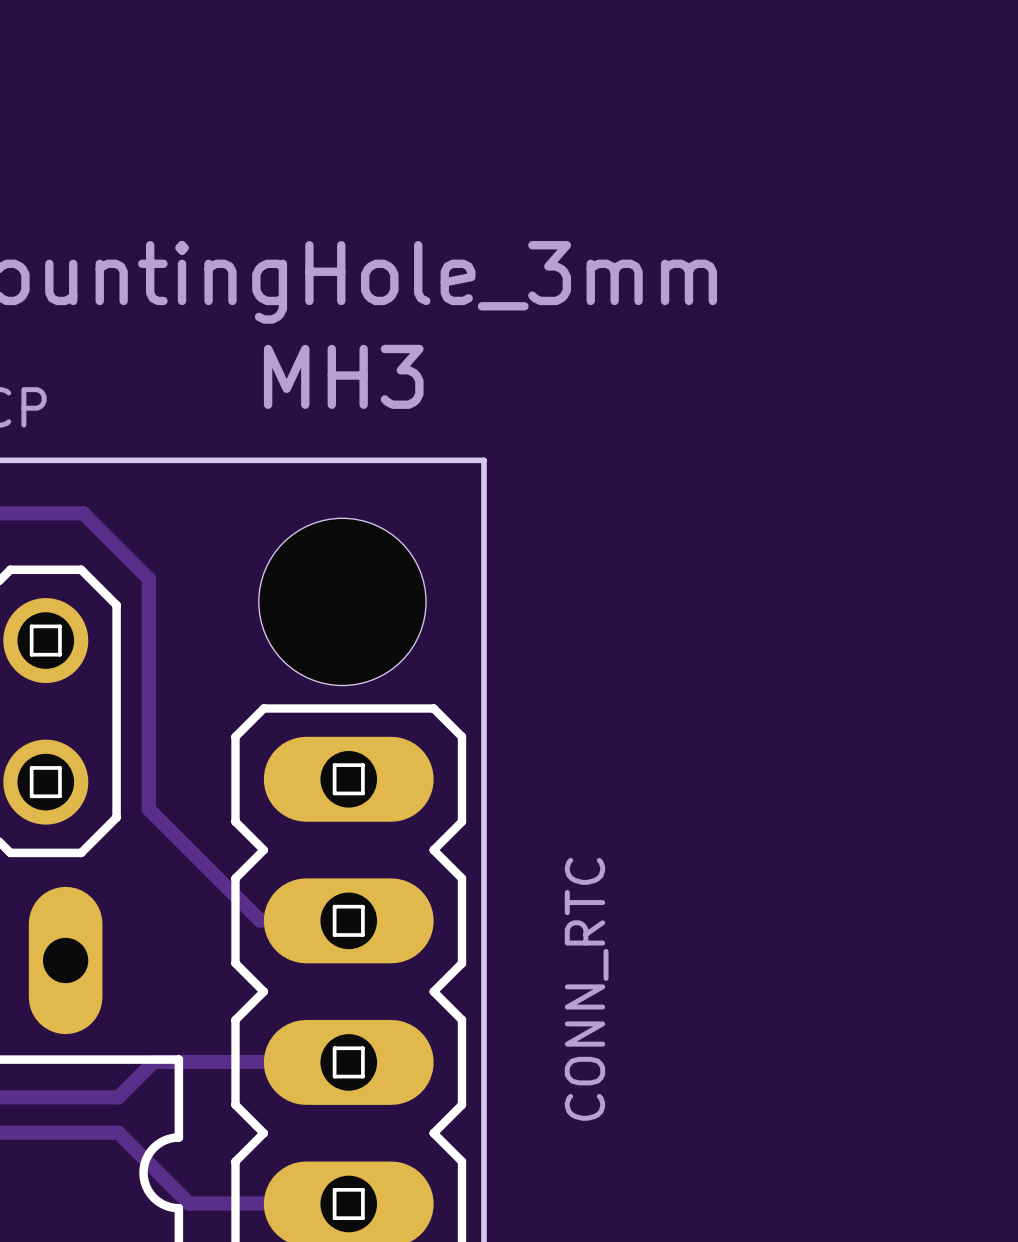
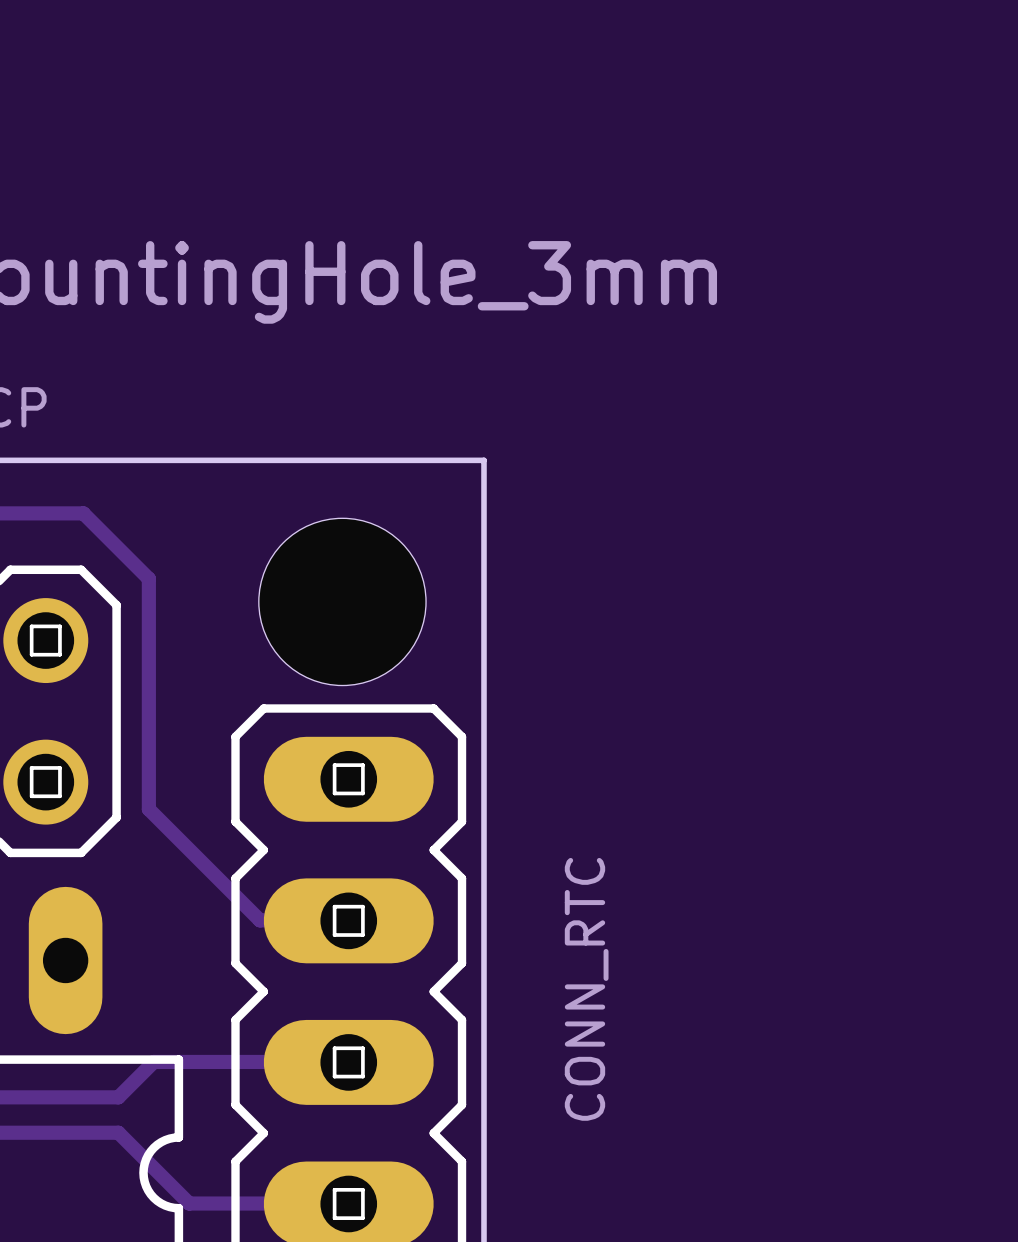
MH3 name: MH3 (343, 376) -> none

